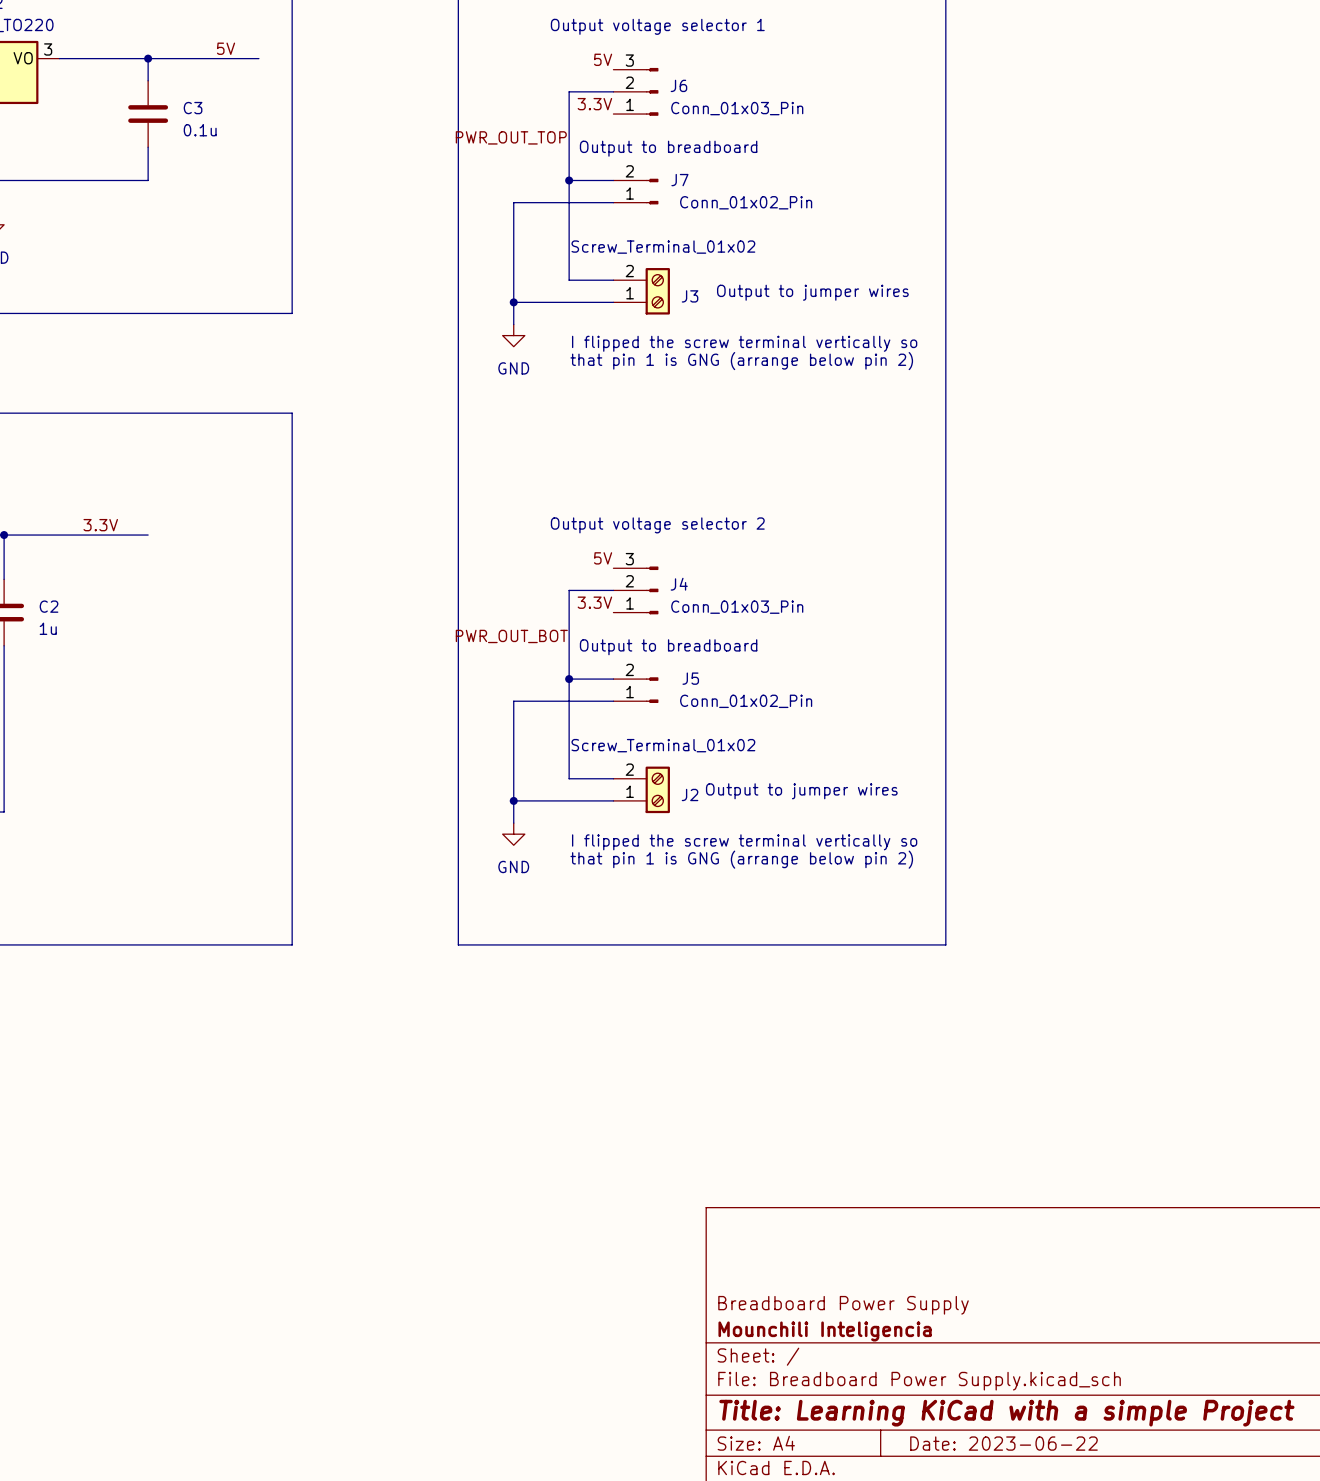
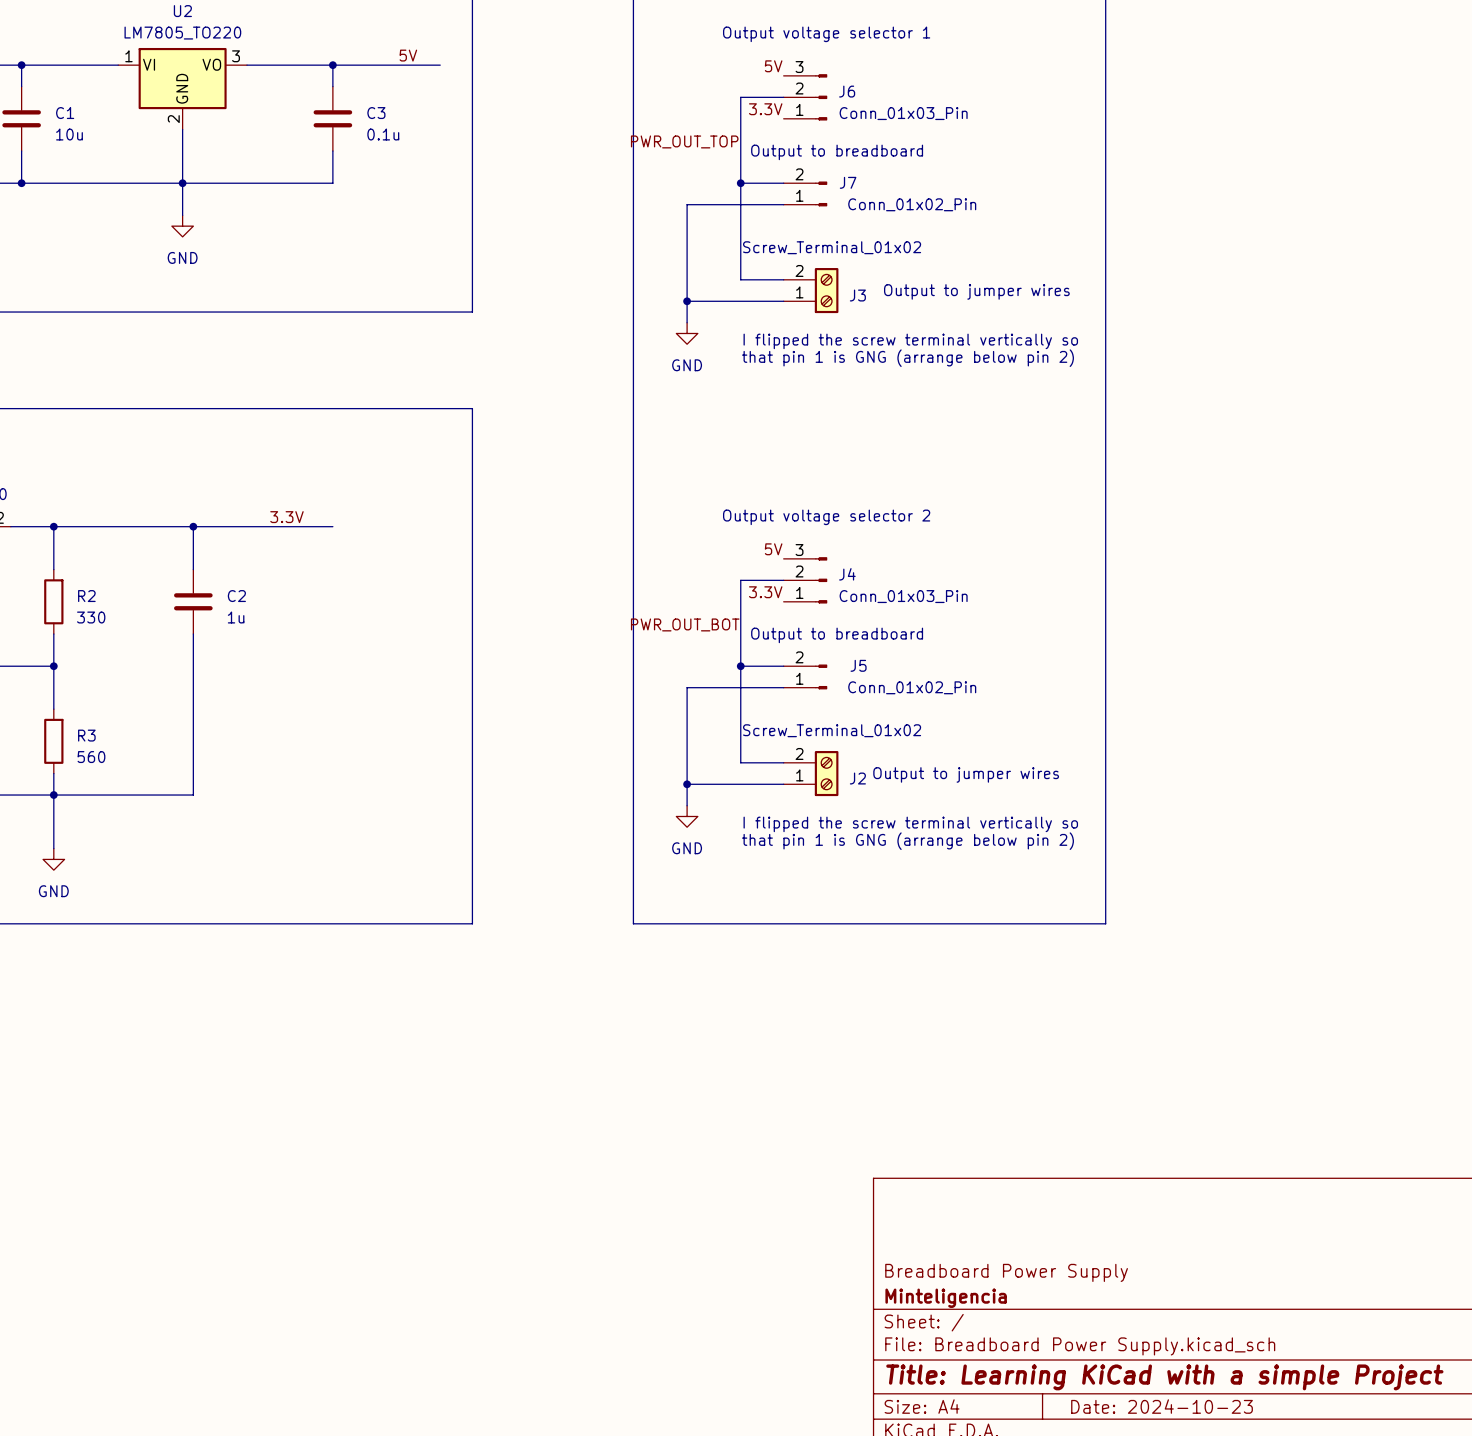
title block: Mounchili Inteligencia (825, 1331) -> Minteligencia (946, 1298)
title block: Date: 2023-06-22 (1003, 1443) -> Date: 2024-10-23 (1162, 1406)

